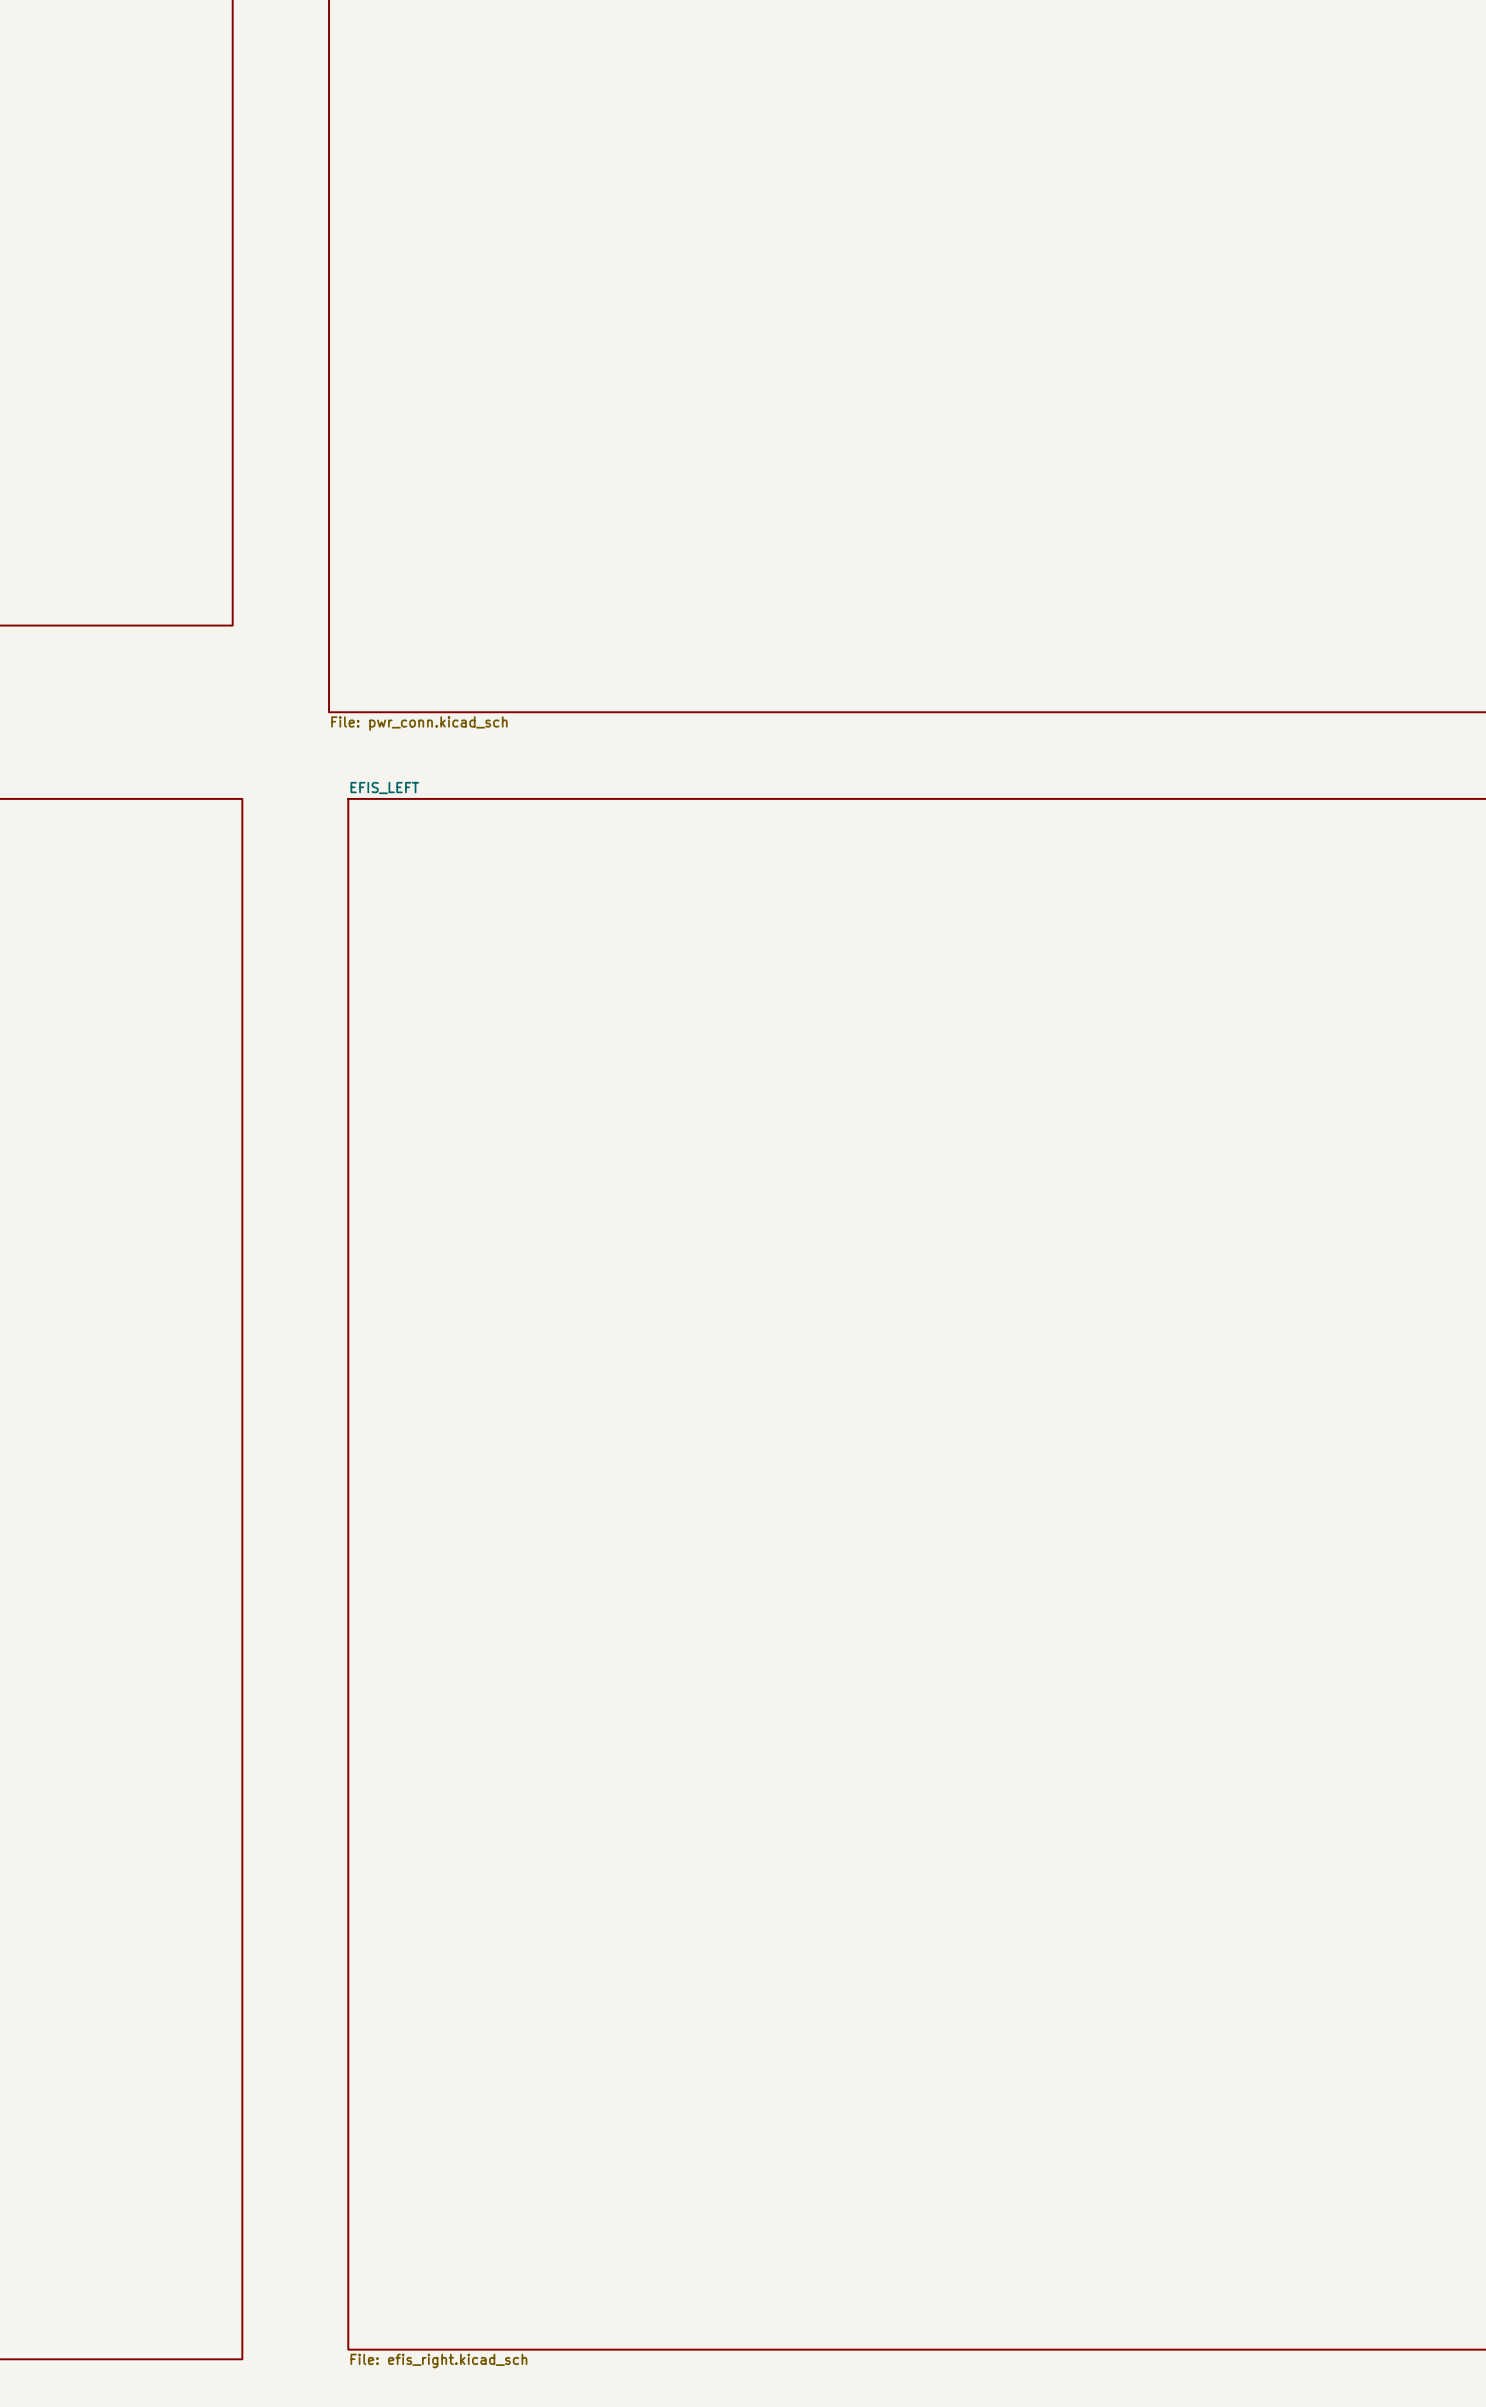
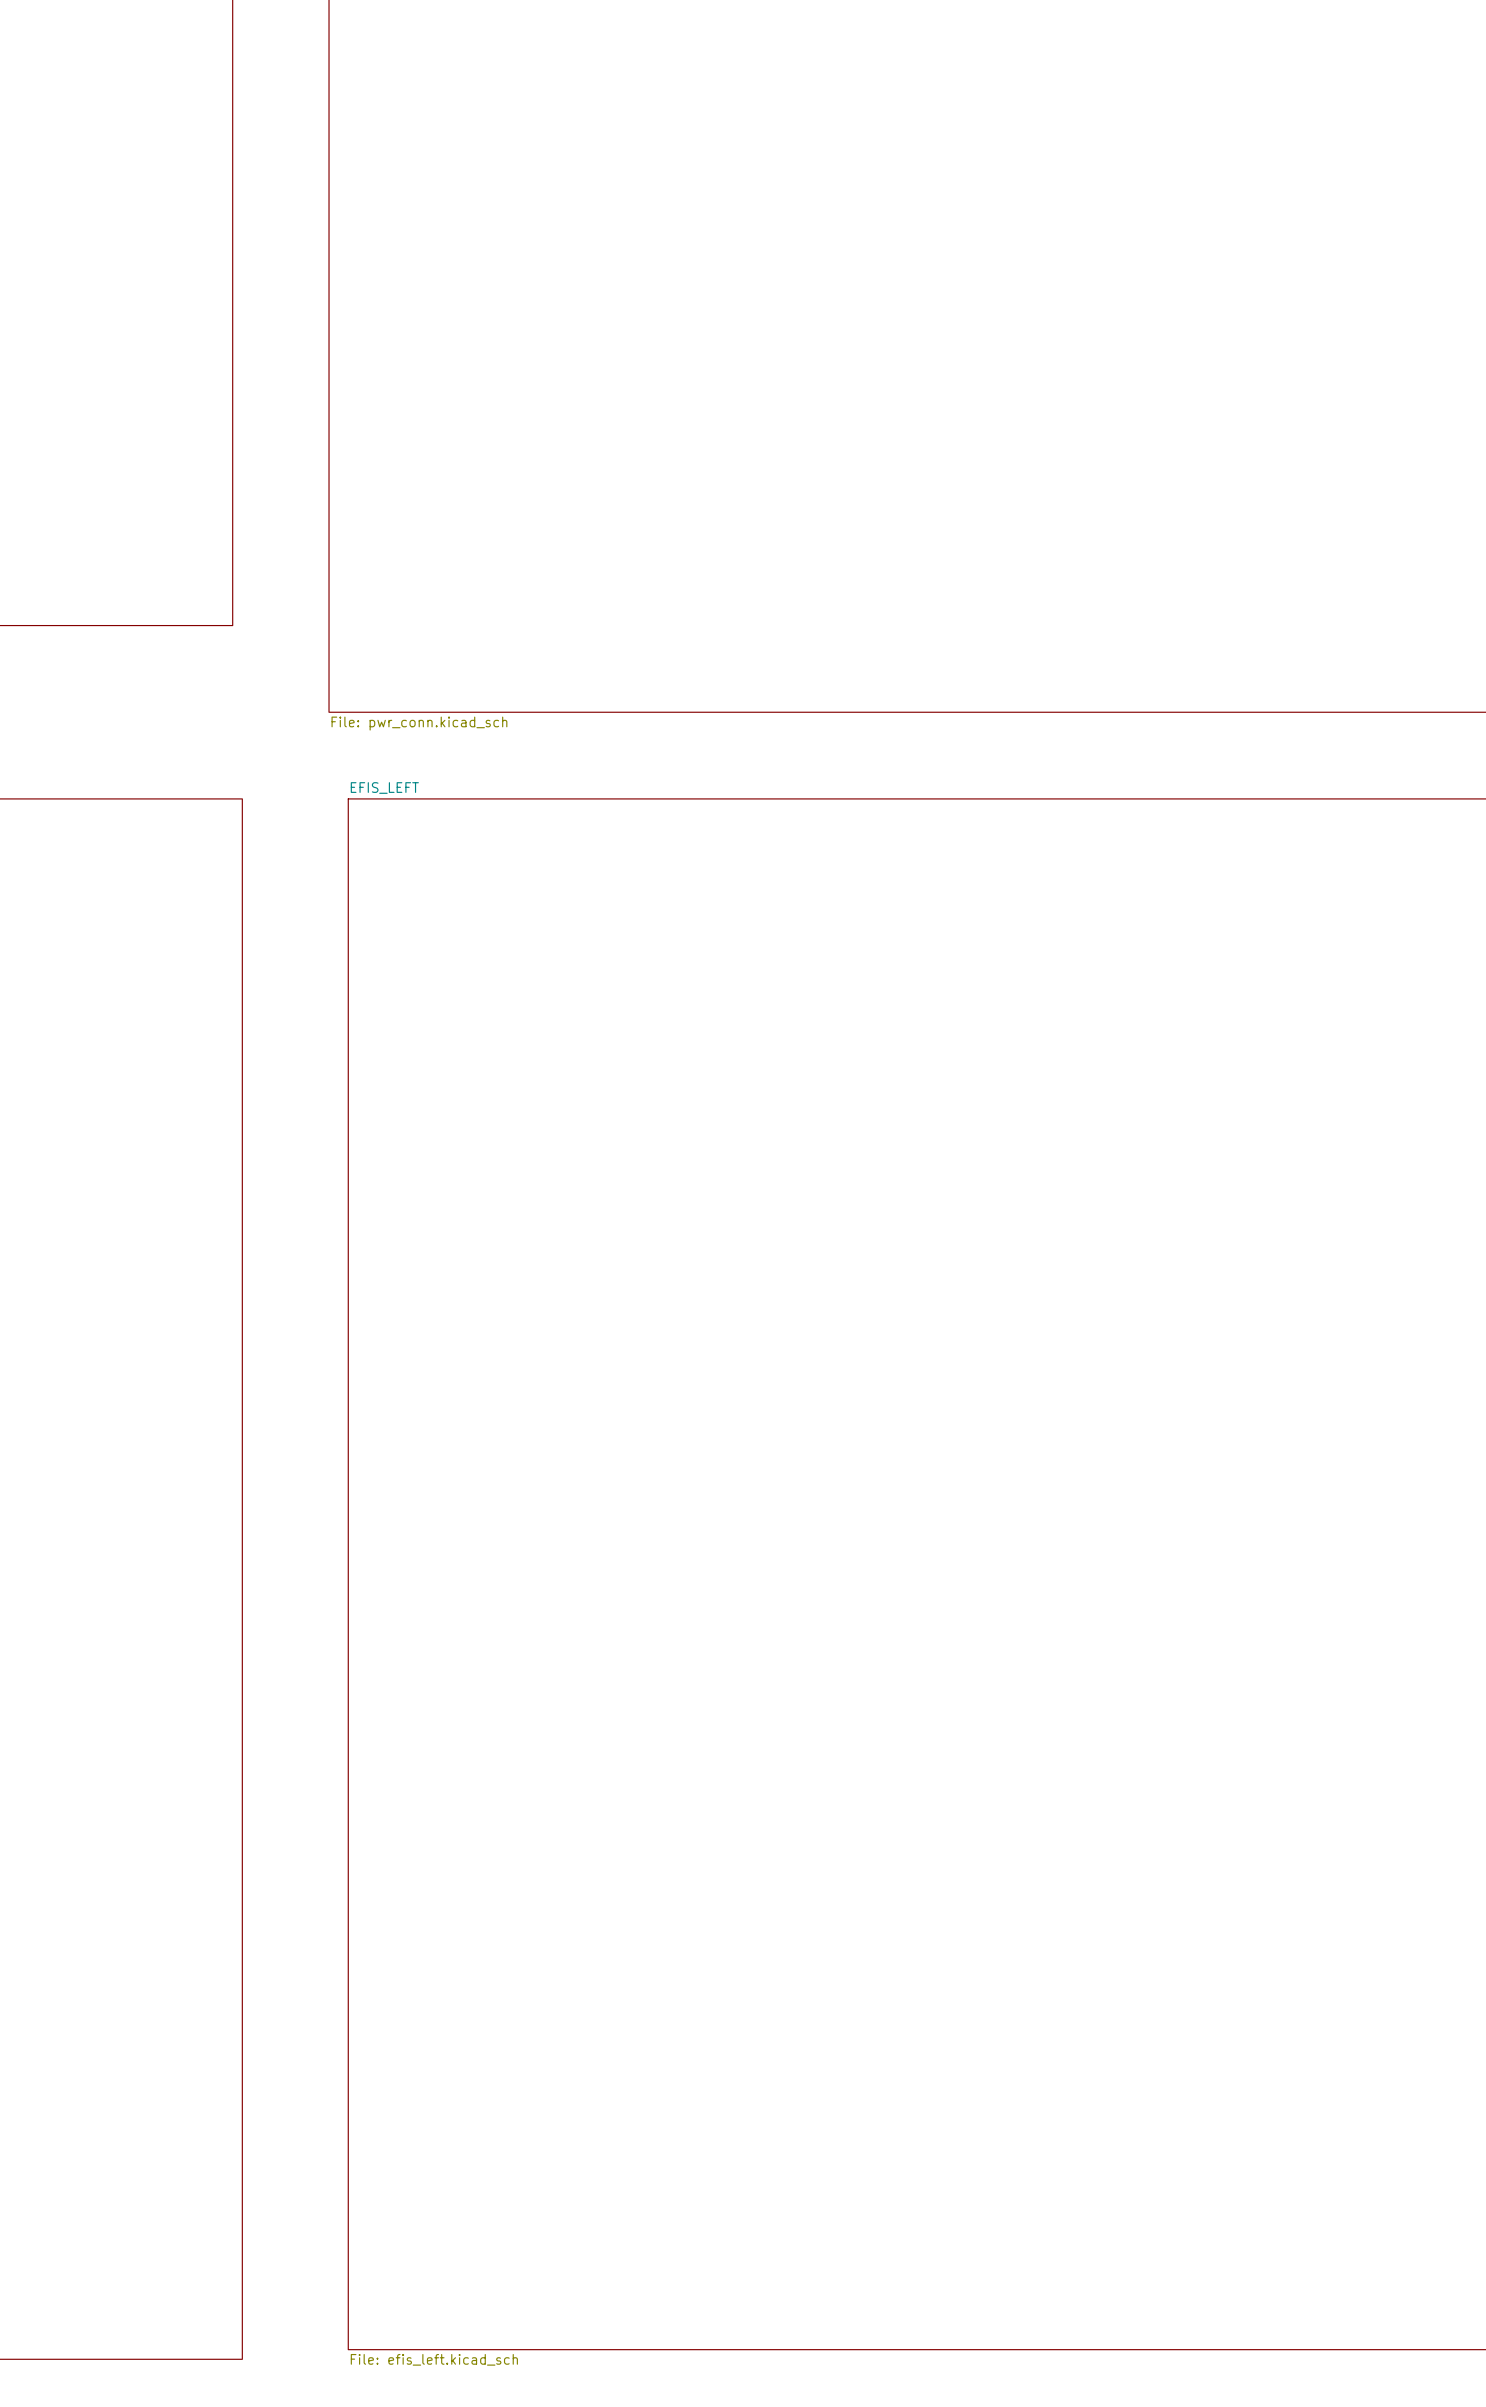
sheet EFIS_LEFT value: File: efis_right.kicad_sch (438, 2360) -> File: efis_left.kicad_sch (434, 2359)

